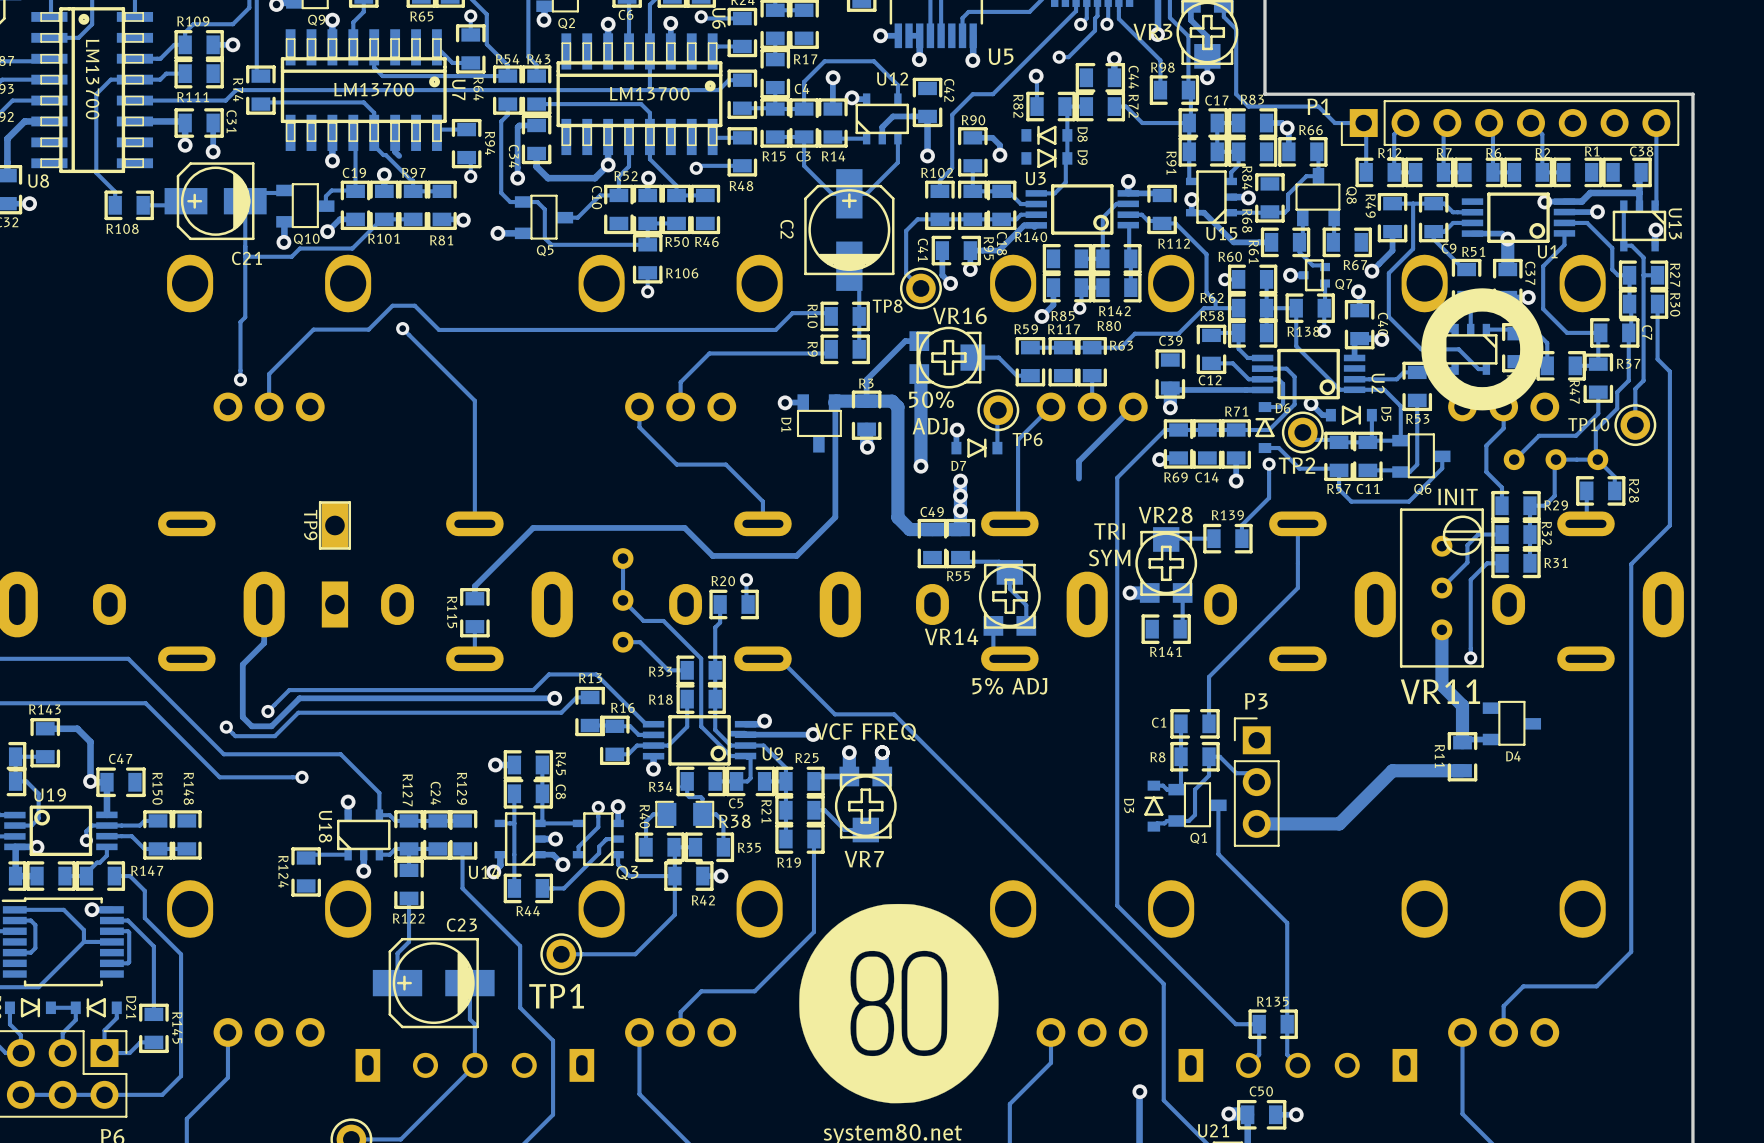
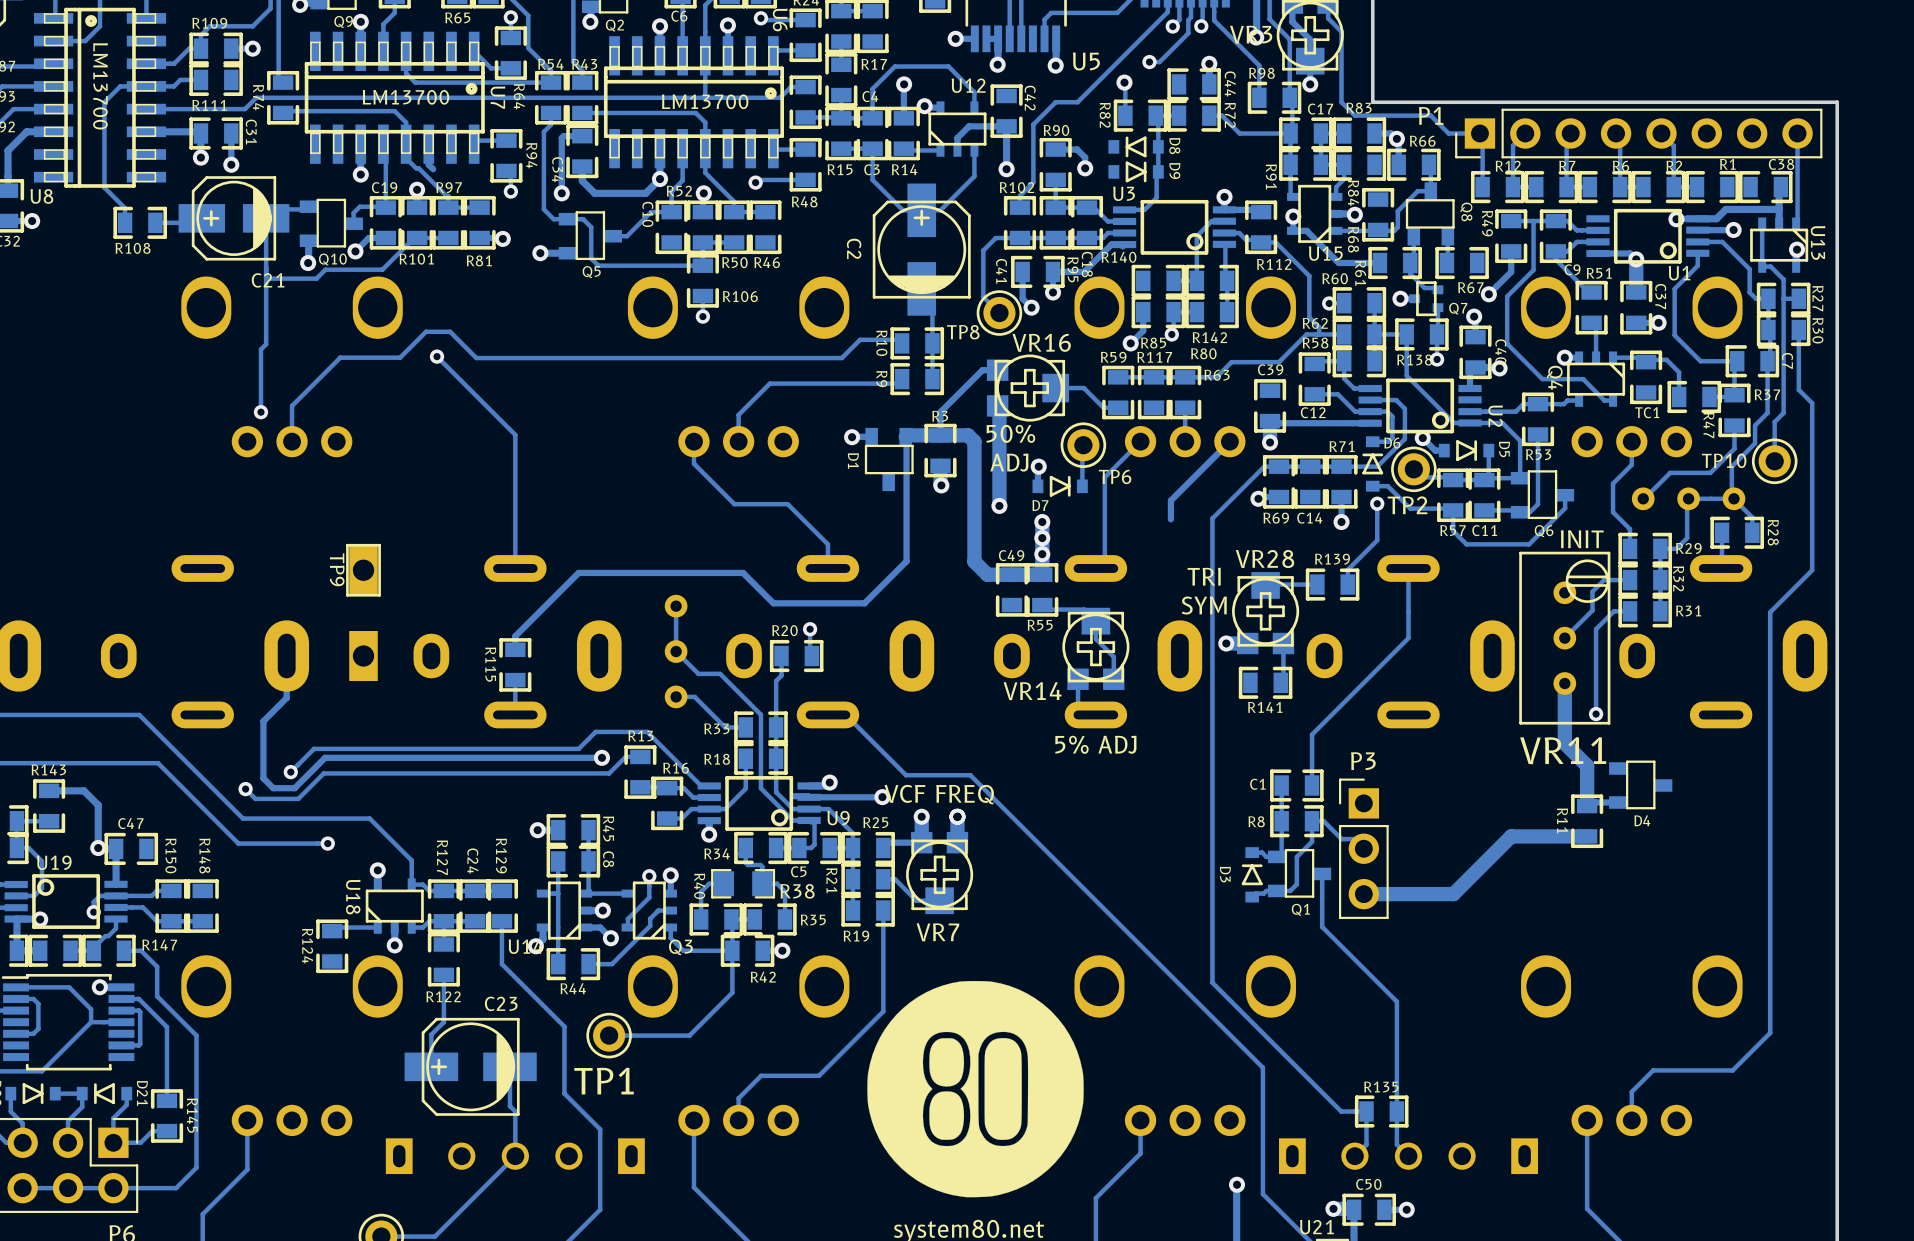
drawing: [1421, 288, 1544, 411] -> none

